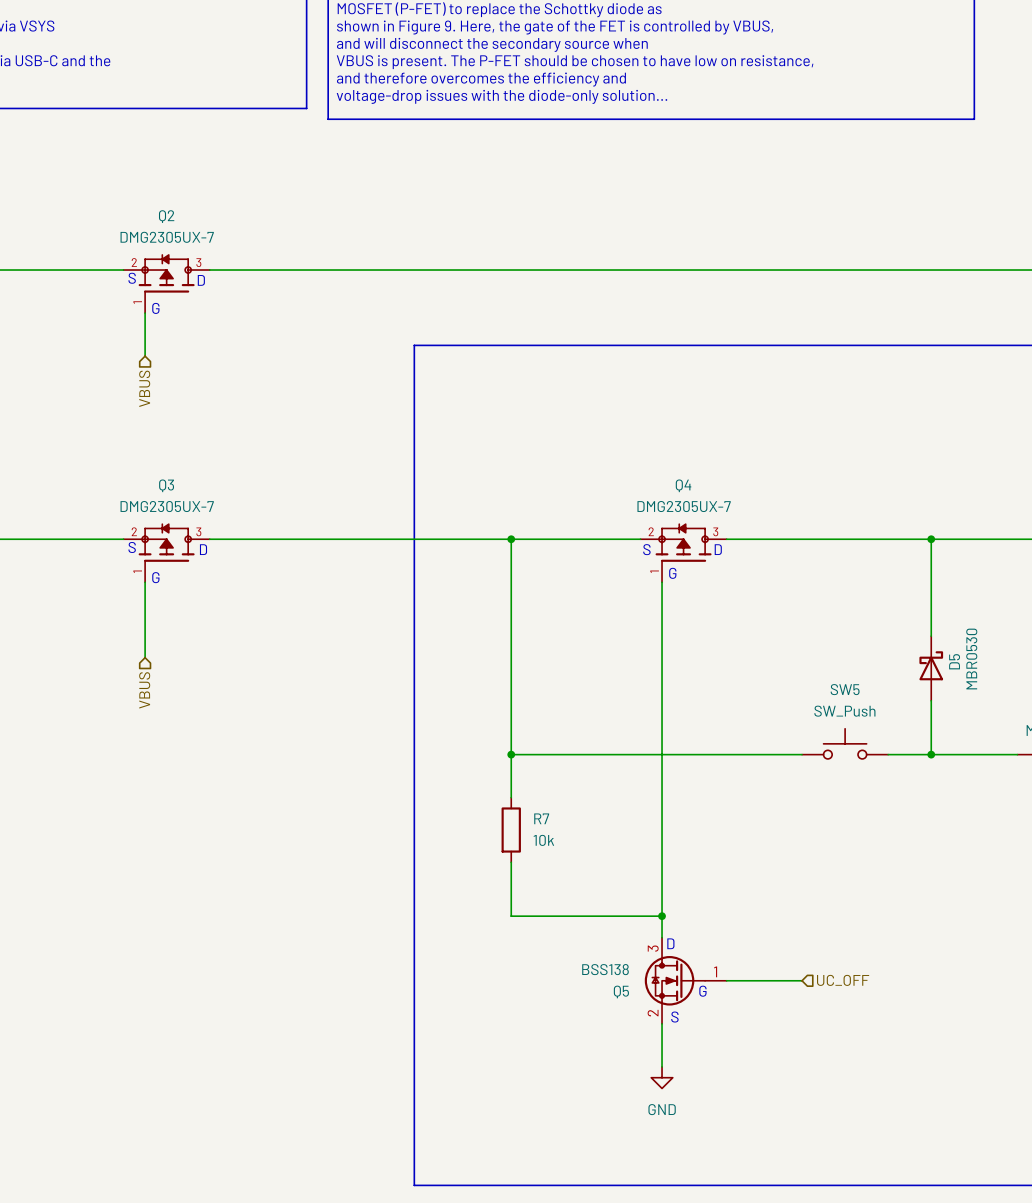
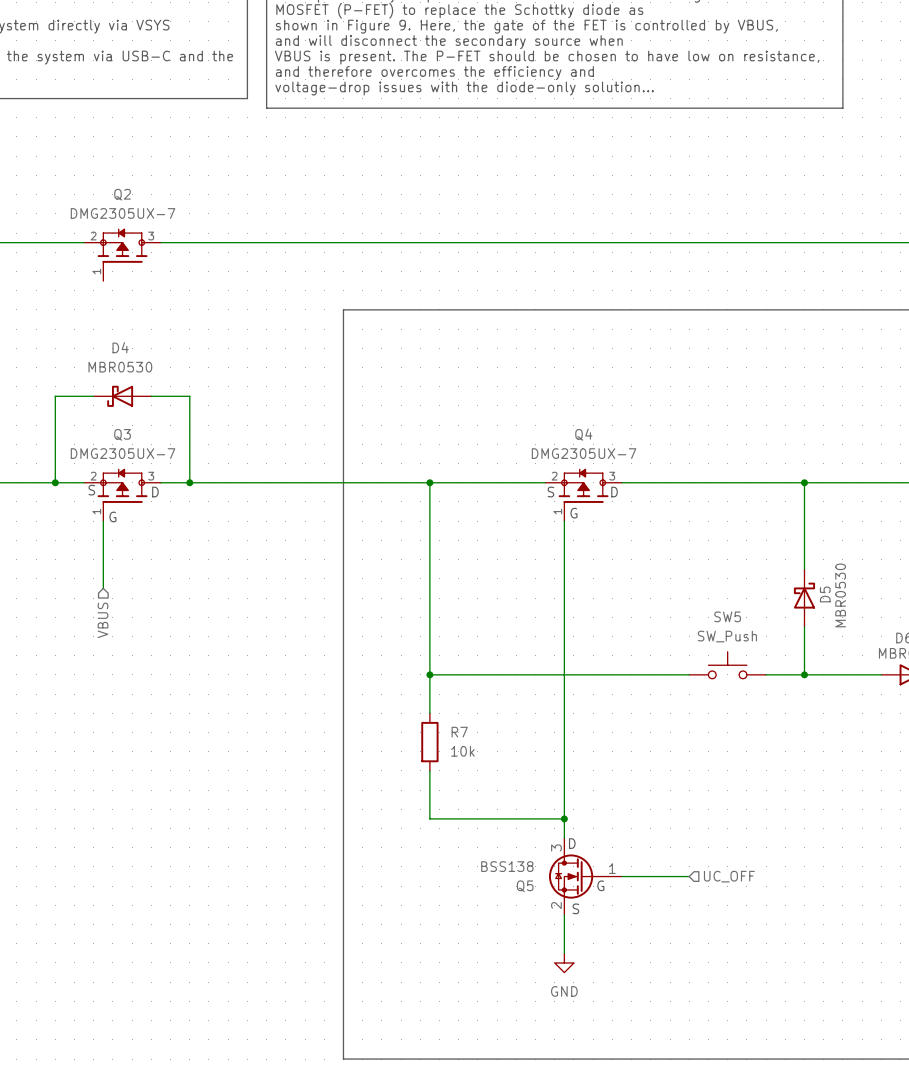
text: S (132, 278) -> none
text: D (201, 280) -> none
text: G (155, 308) -> none
wire: (145, 313) (145, 356) -> none
hierarchical label: VBUS (144, 388) -> none
wire: none -> (93, 396) (55, 396) (55, 482)
D4: none -> MBR0530 (122, 396)
wire: none -> (151, 396) (189, 396) (189, 482)
junction: none -> (55, 482)
junction: none -> (189, 482)

